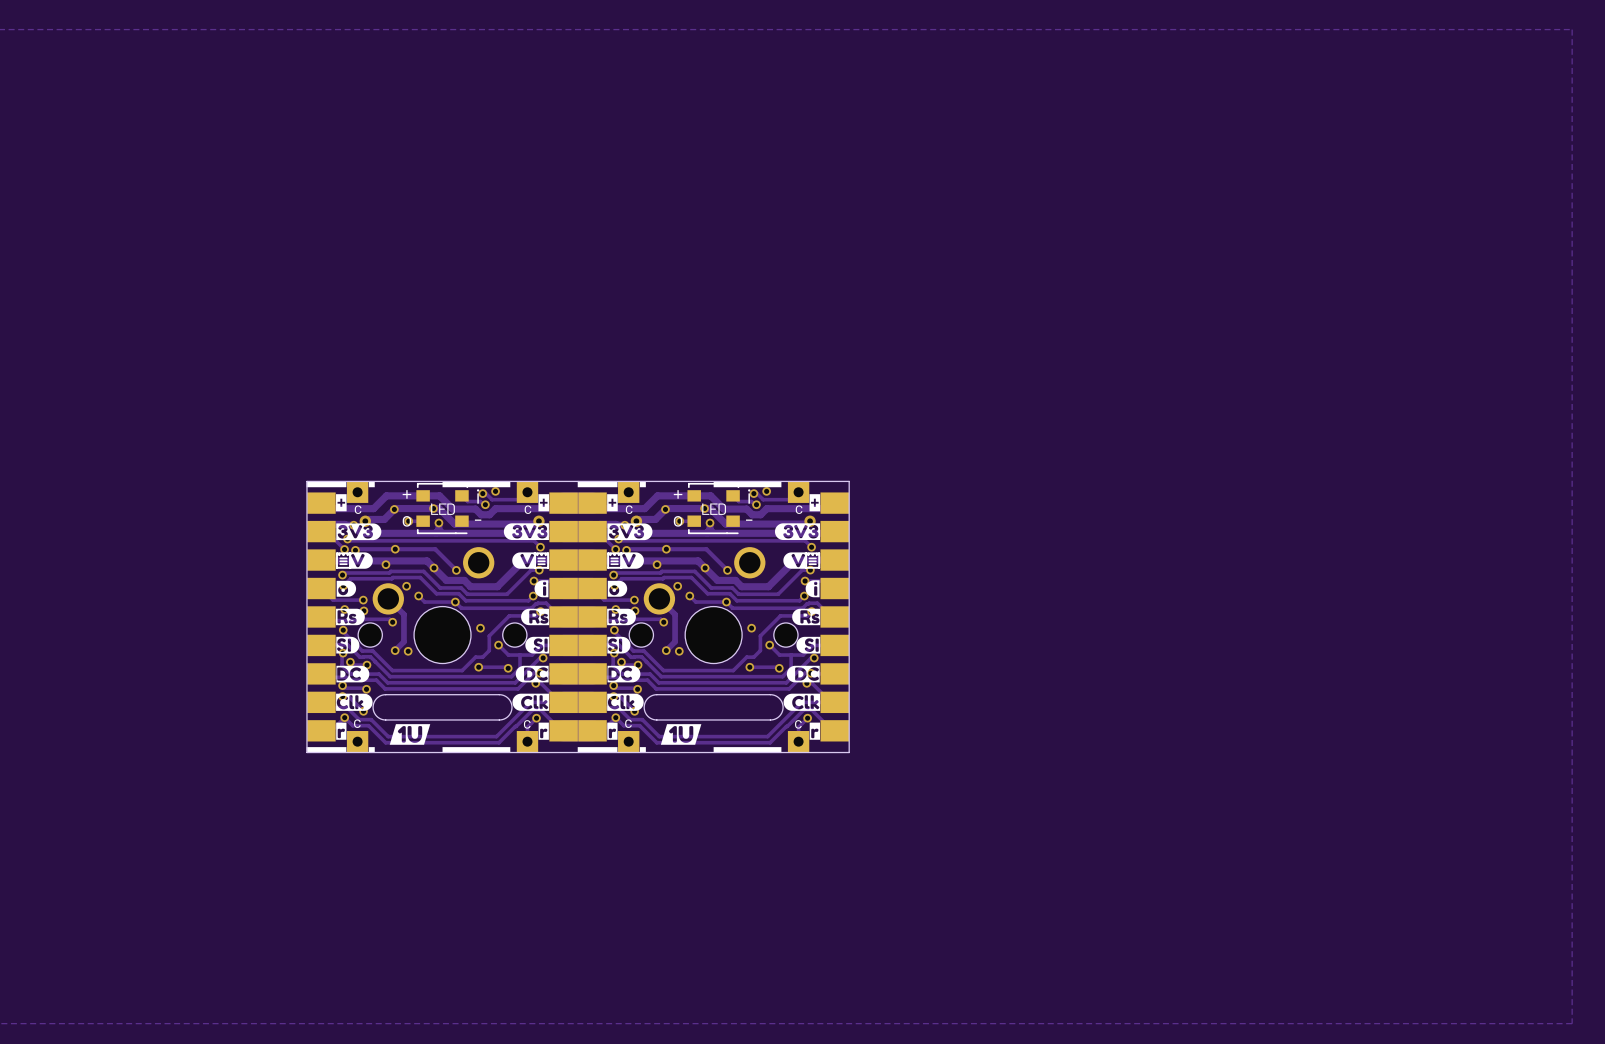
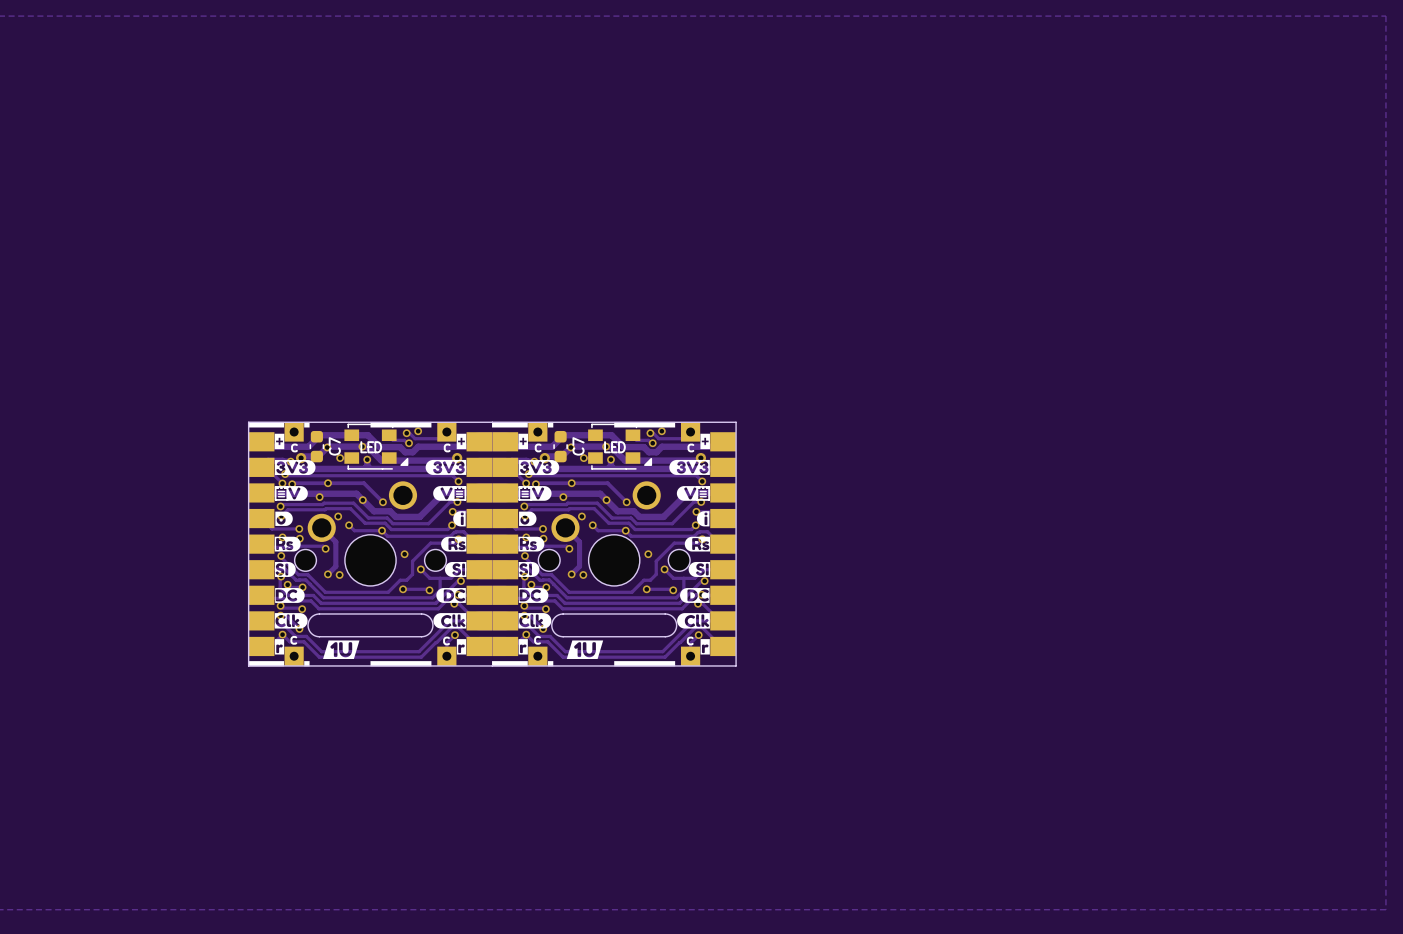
part footprint: [416, 482, 469, 535] -> [344, 423, 409, 470]
part footprint: [687, 482, 740, 535] -> [588, 423, 653, 470]
C7: none -> (316, 446)
C7: none -> (560, 446)

